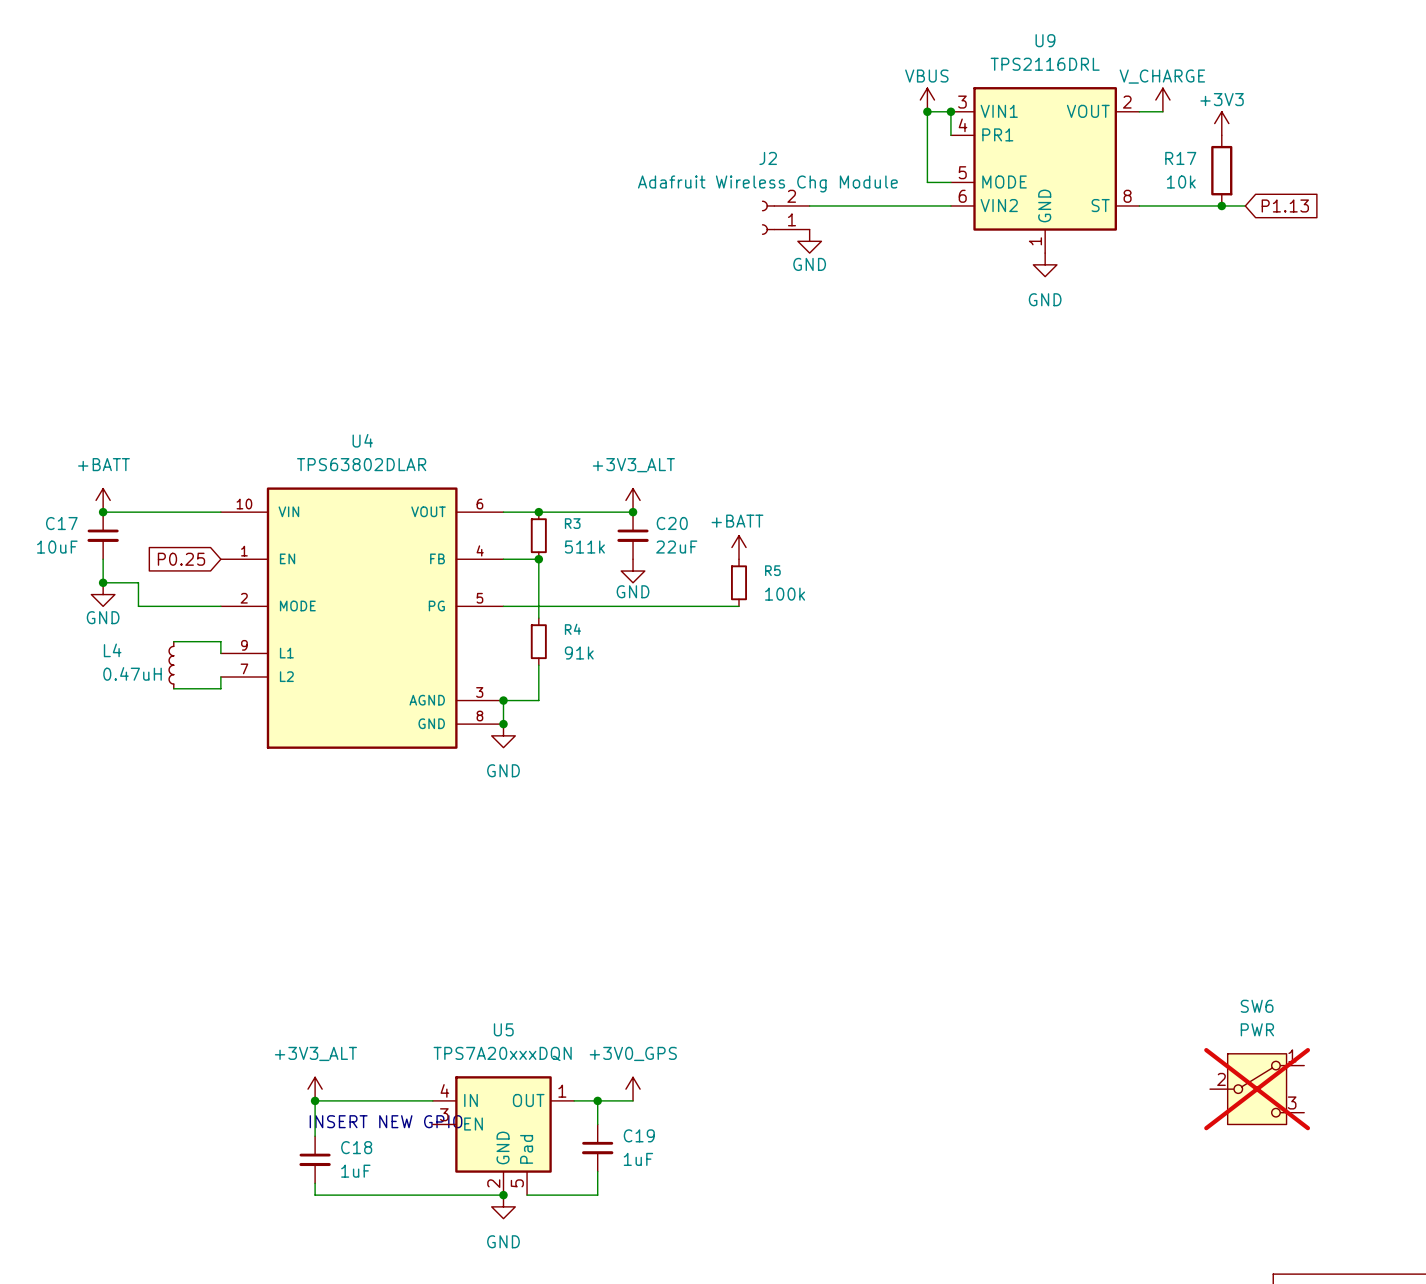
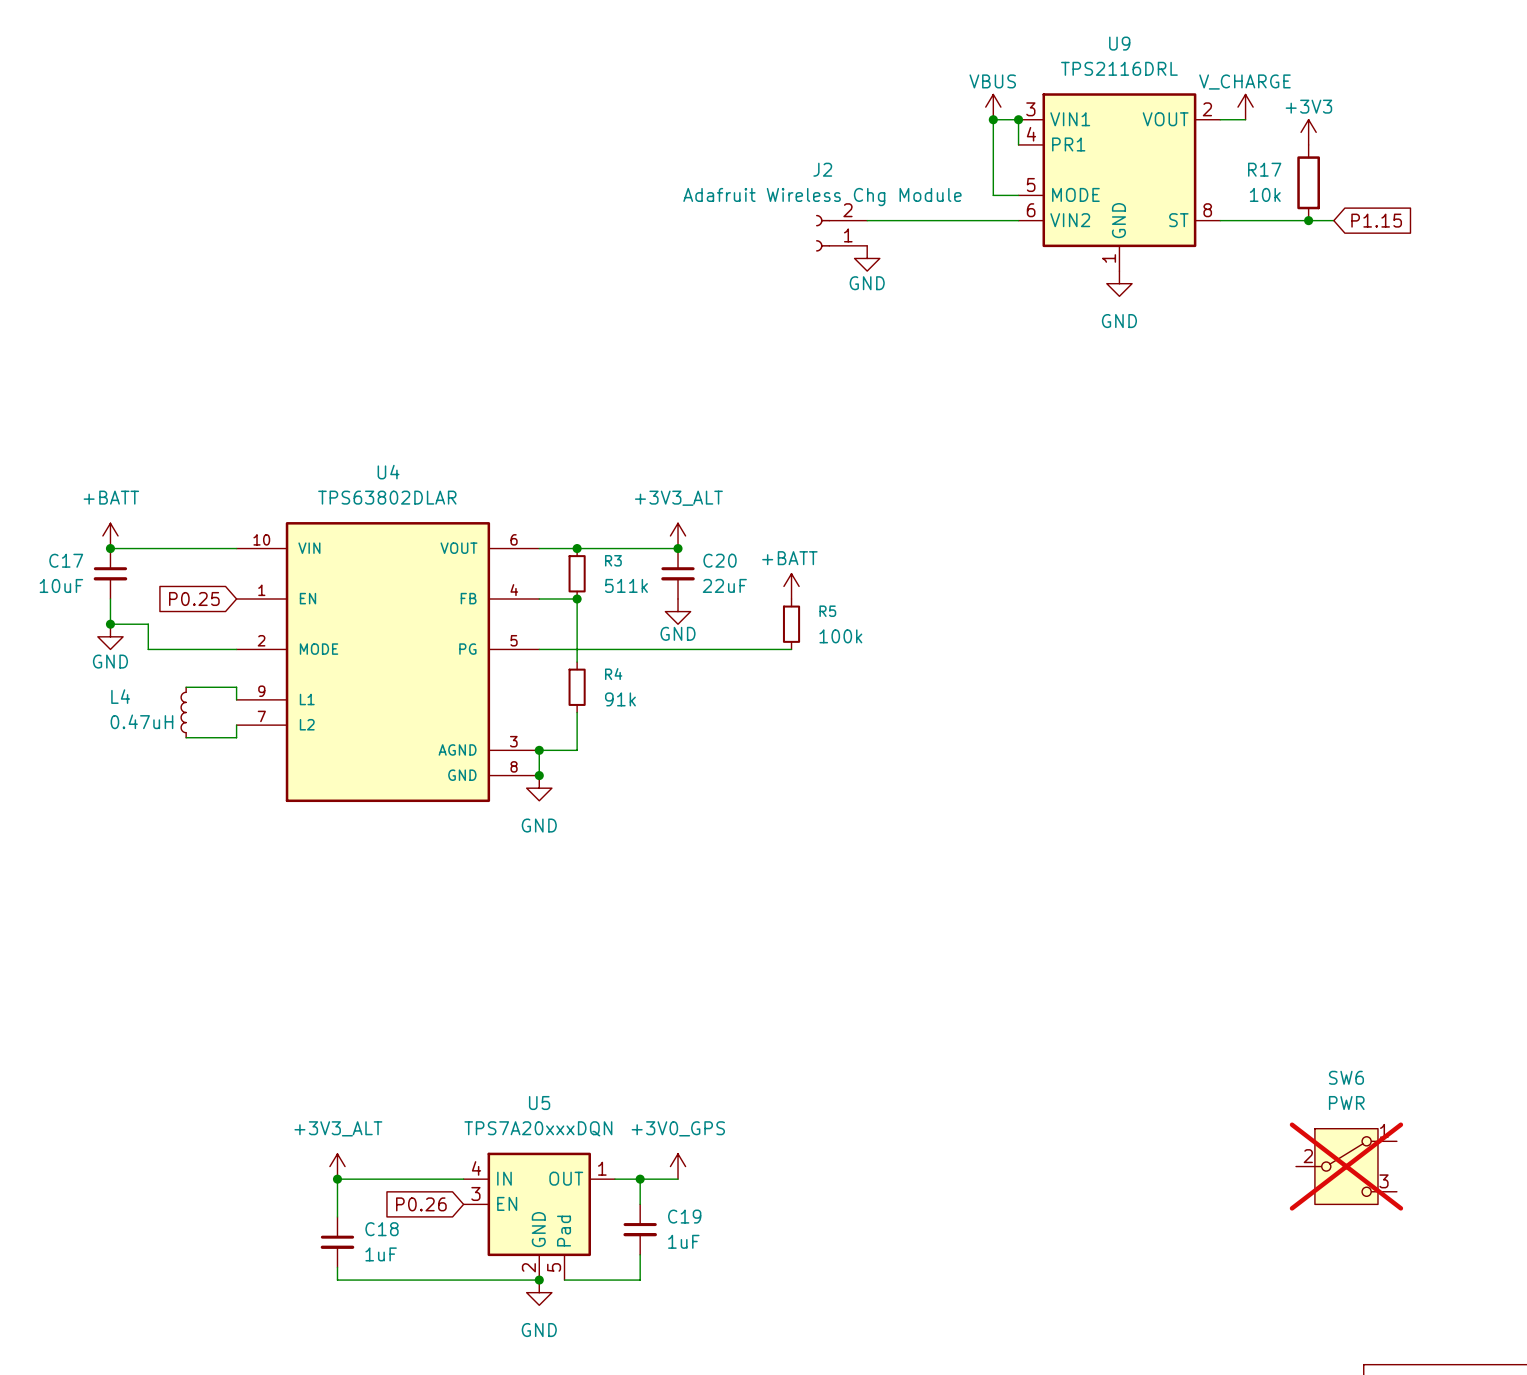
global label: P1.13 (1285, 205) -> P1.15 (1376, 220)
text: INSERT NEW GPIO (386, 1121) -> none
global label: none -> P0.26 (421, 1204)

